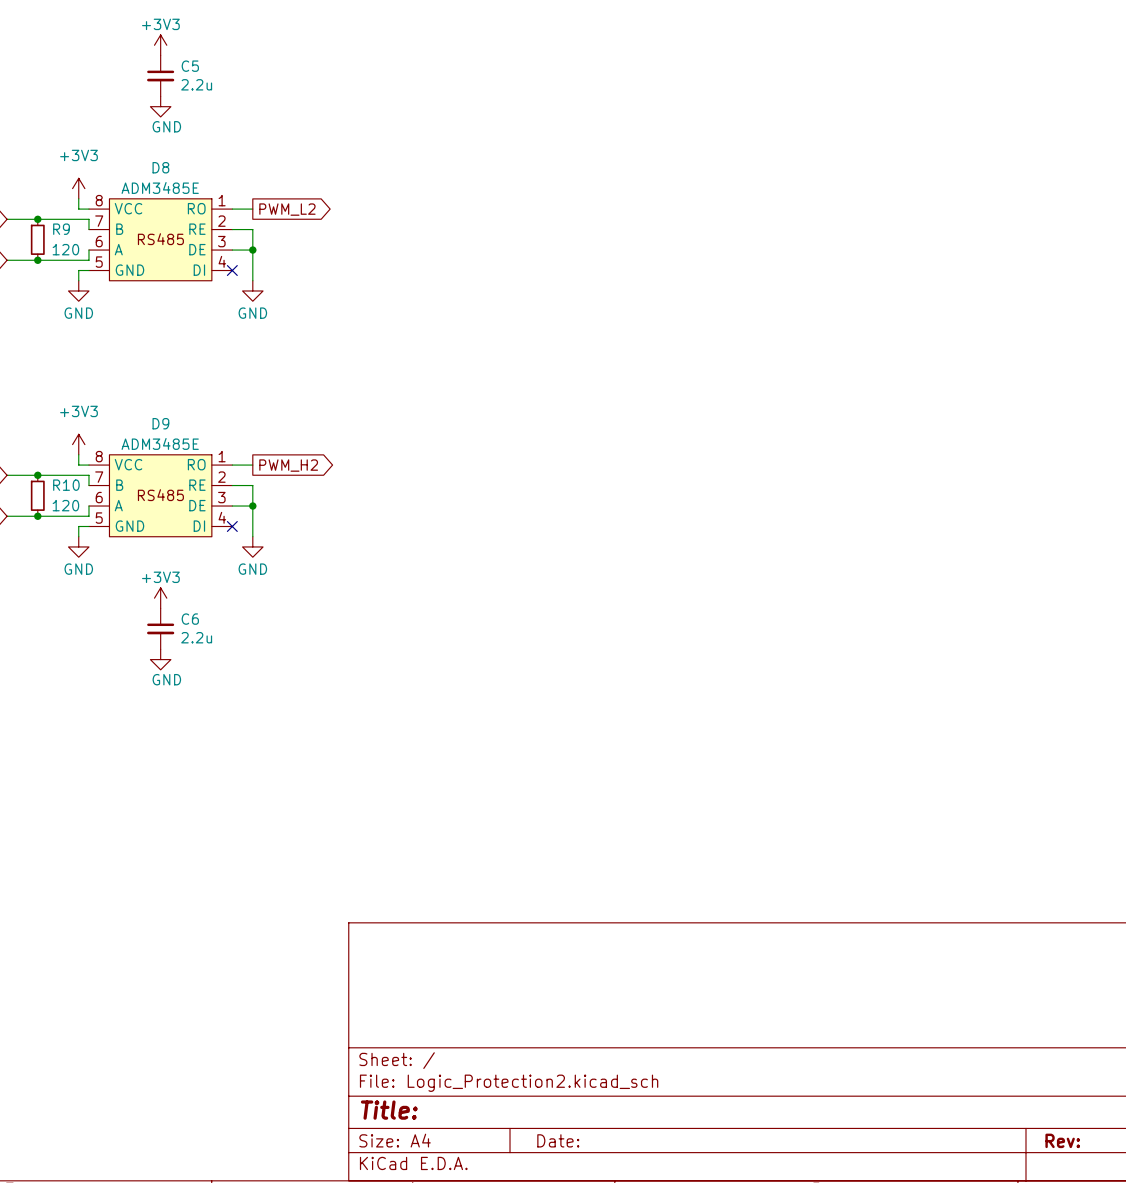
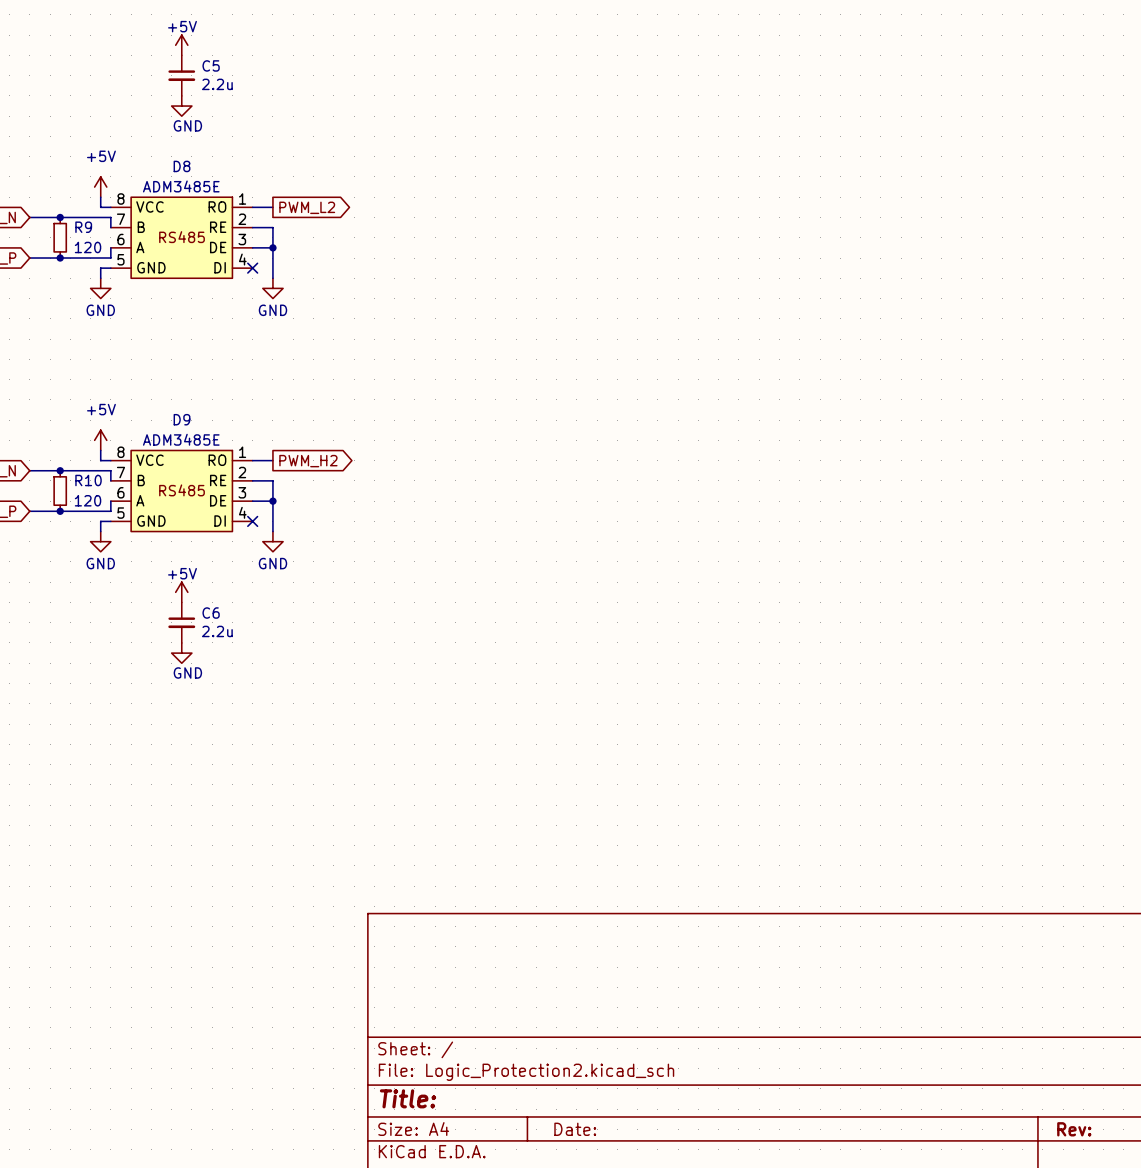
power symbol: +3V3 (160, 45) -> +5V (181, 45)
power symbol: +3V3 (78, 188) -> +5V (100, 187)
power symbol: +3V3 (78, 444) -> +5V (100, 440)
power symbol: +3V3 (160, 598) -> +5V (181, 592)

